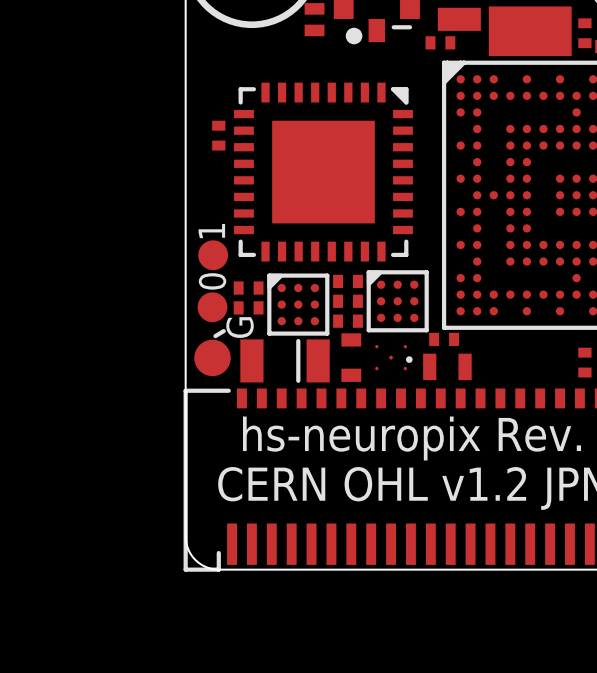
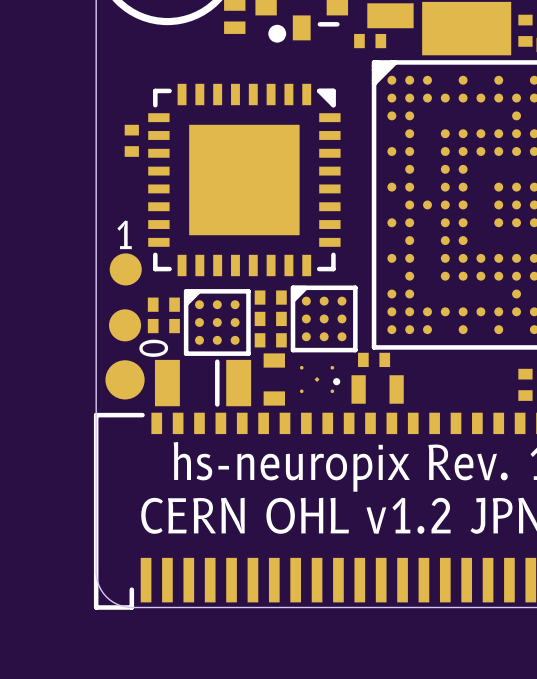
text rotation: 0° (211, 231) -> 90° clockwise (124, 234)
text: 0 (212, 281) -> none
text: G (240, 327) -> 0 (153, 348)
line: (223, 331) (215, 336) -> none

